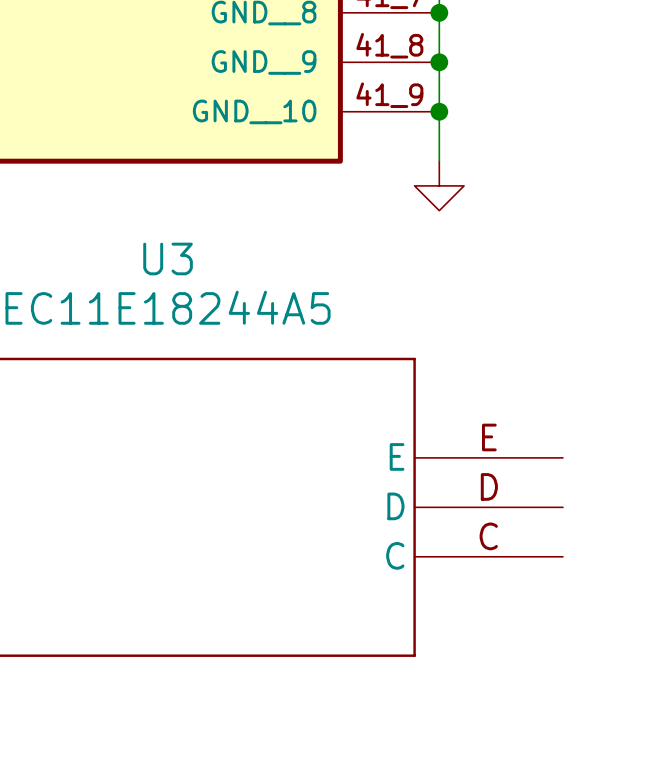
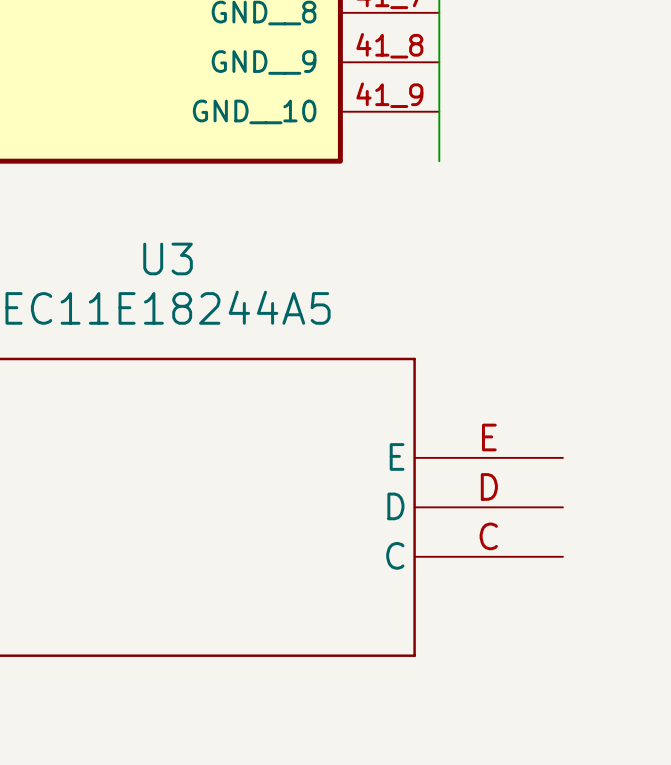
junction: (439, 12) -> none
junction: (439, 62) -> none
junction: (439, 111) -> none
power symbol: (439, 185) -> none

